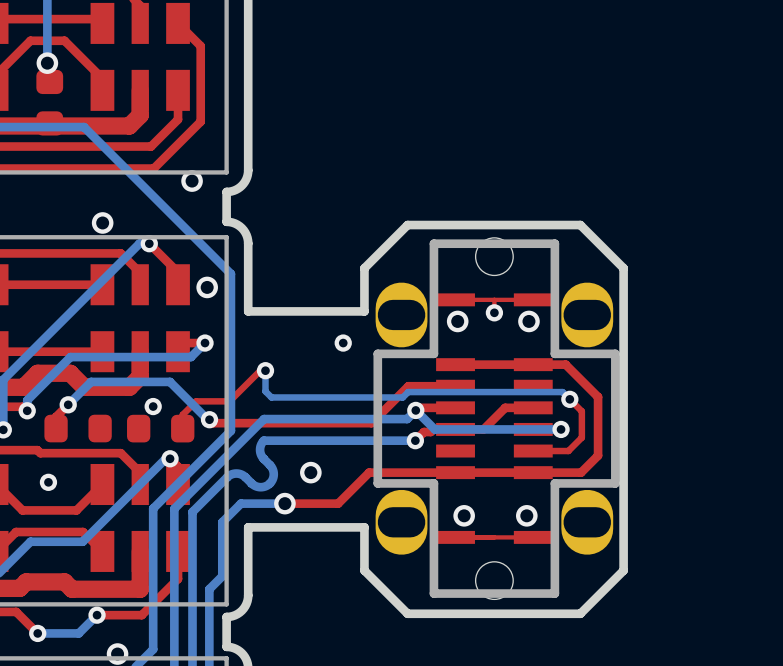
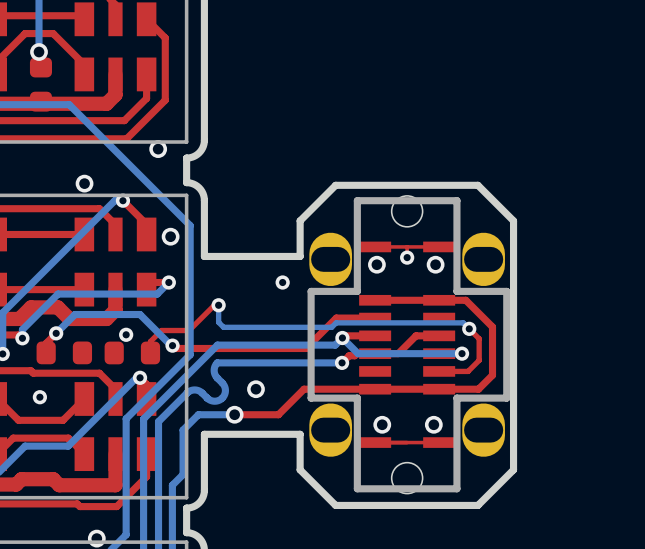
top track: (16, 611) (37, 633) -> (13, 503) (77, 503) (79, 506)
bottom track: (97, 615) (78, 633) (37, 633) -> none
via: (97, 615) -> none
via: (37, 633) -> none

